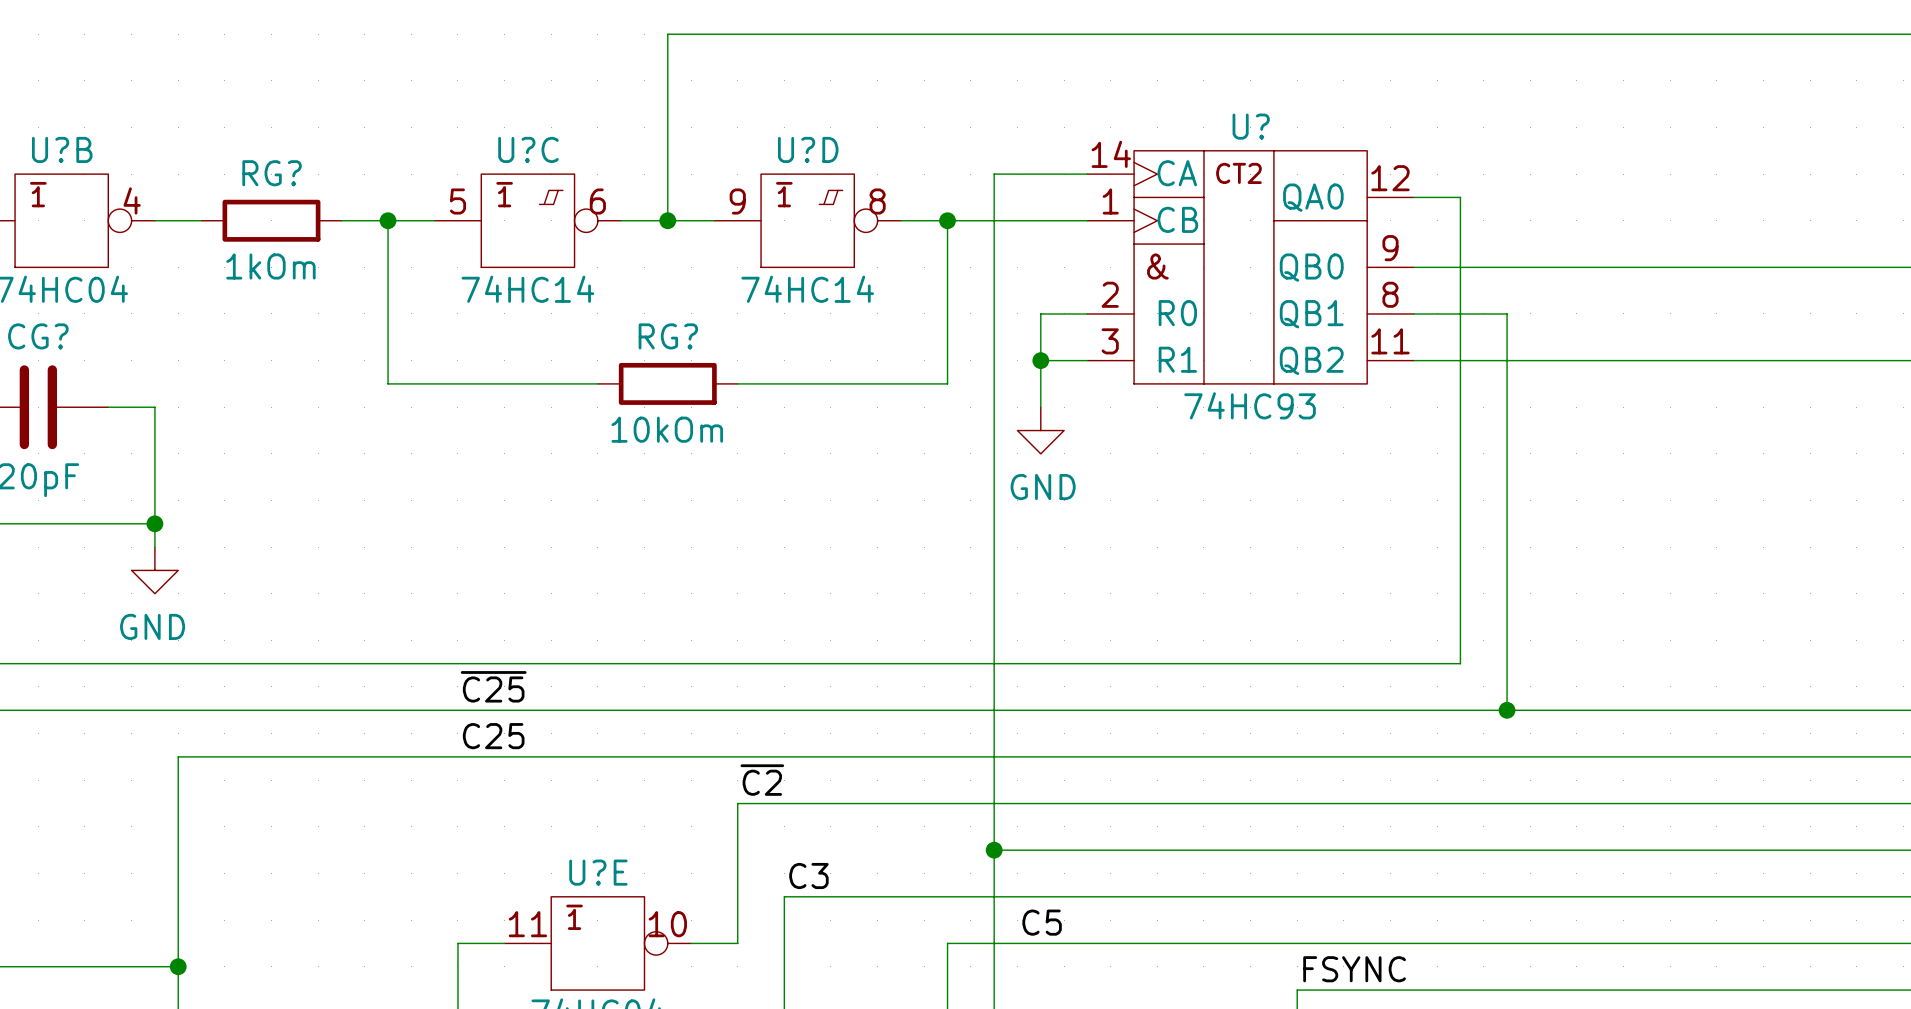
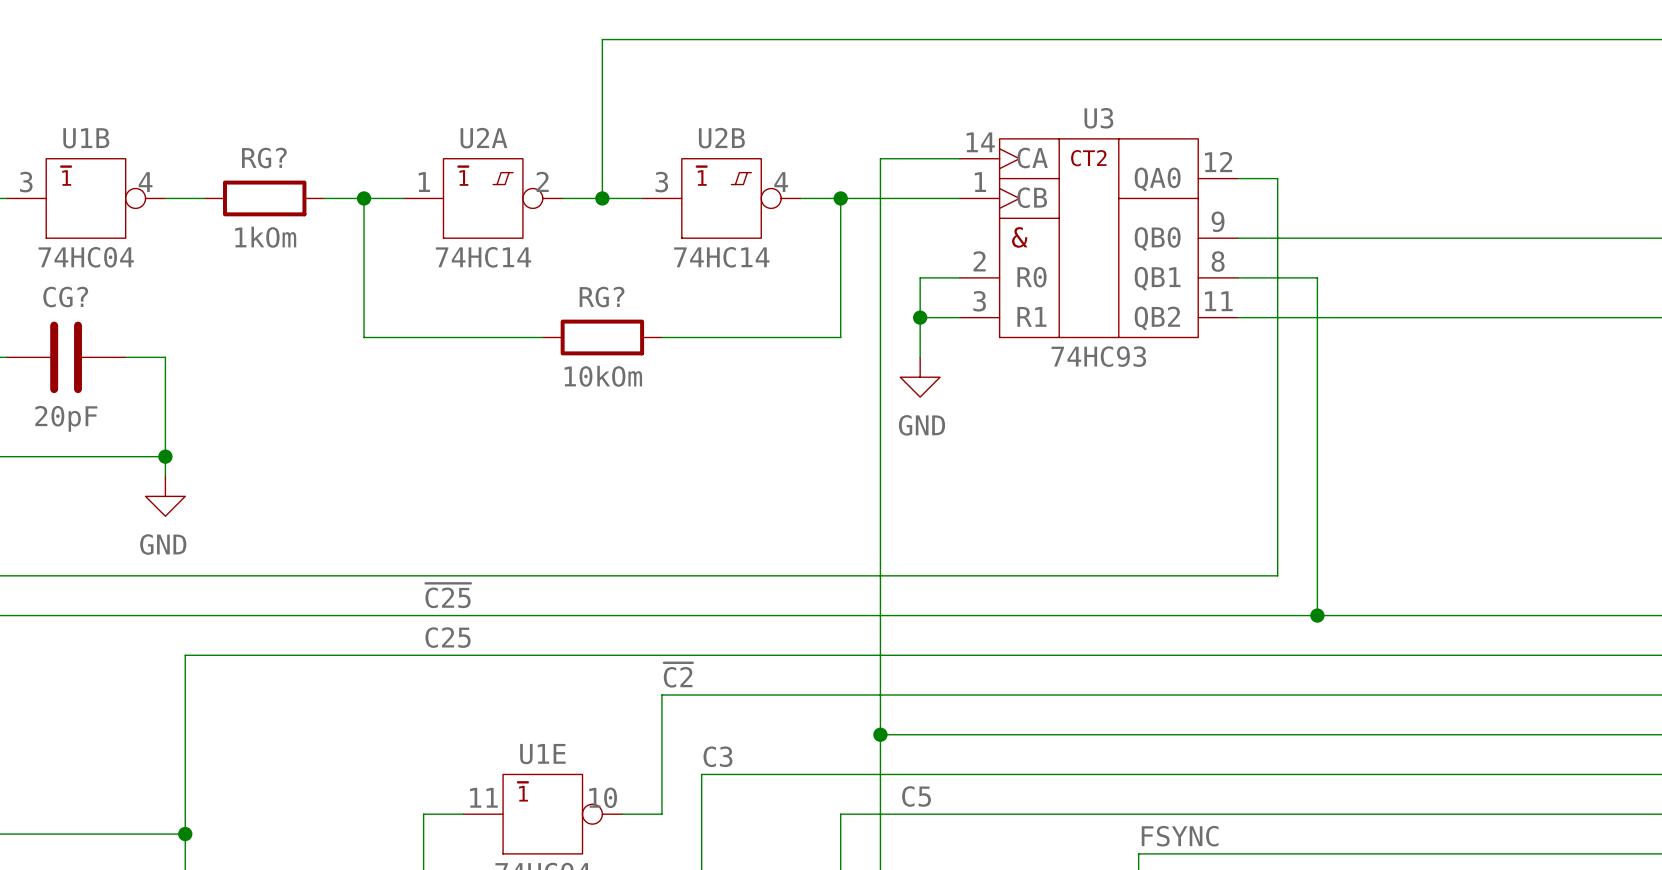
U? name: U? (1251, 126) -> U3 (1098, 118)
U?B name: U?B (62, 149) -> U1B (86, 138)
U?C name: U?C (528, 149) -> U2A (483, 138)
U?D name: U?D (808, 149) -> U2B (721, 138)
U?C pin number: 5 (457, 201) -> 1 (424, 182)
U?C pin number: 6 (597, 201) -> 2 (542, 181)
U?D pin number: 9 (737, 201) -> 3 (661, 182)
U?D pin number: 8 (877, 201) -> 4 (781, 182)
U?E name: U?E (598, 872) -> U1E (542, 754)

